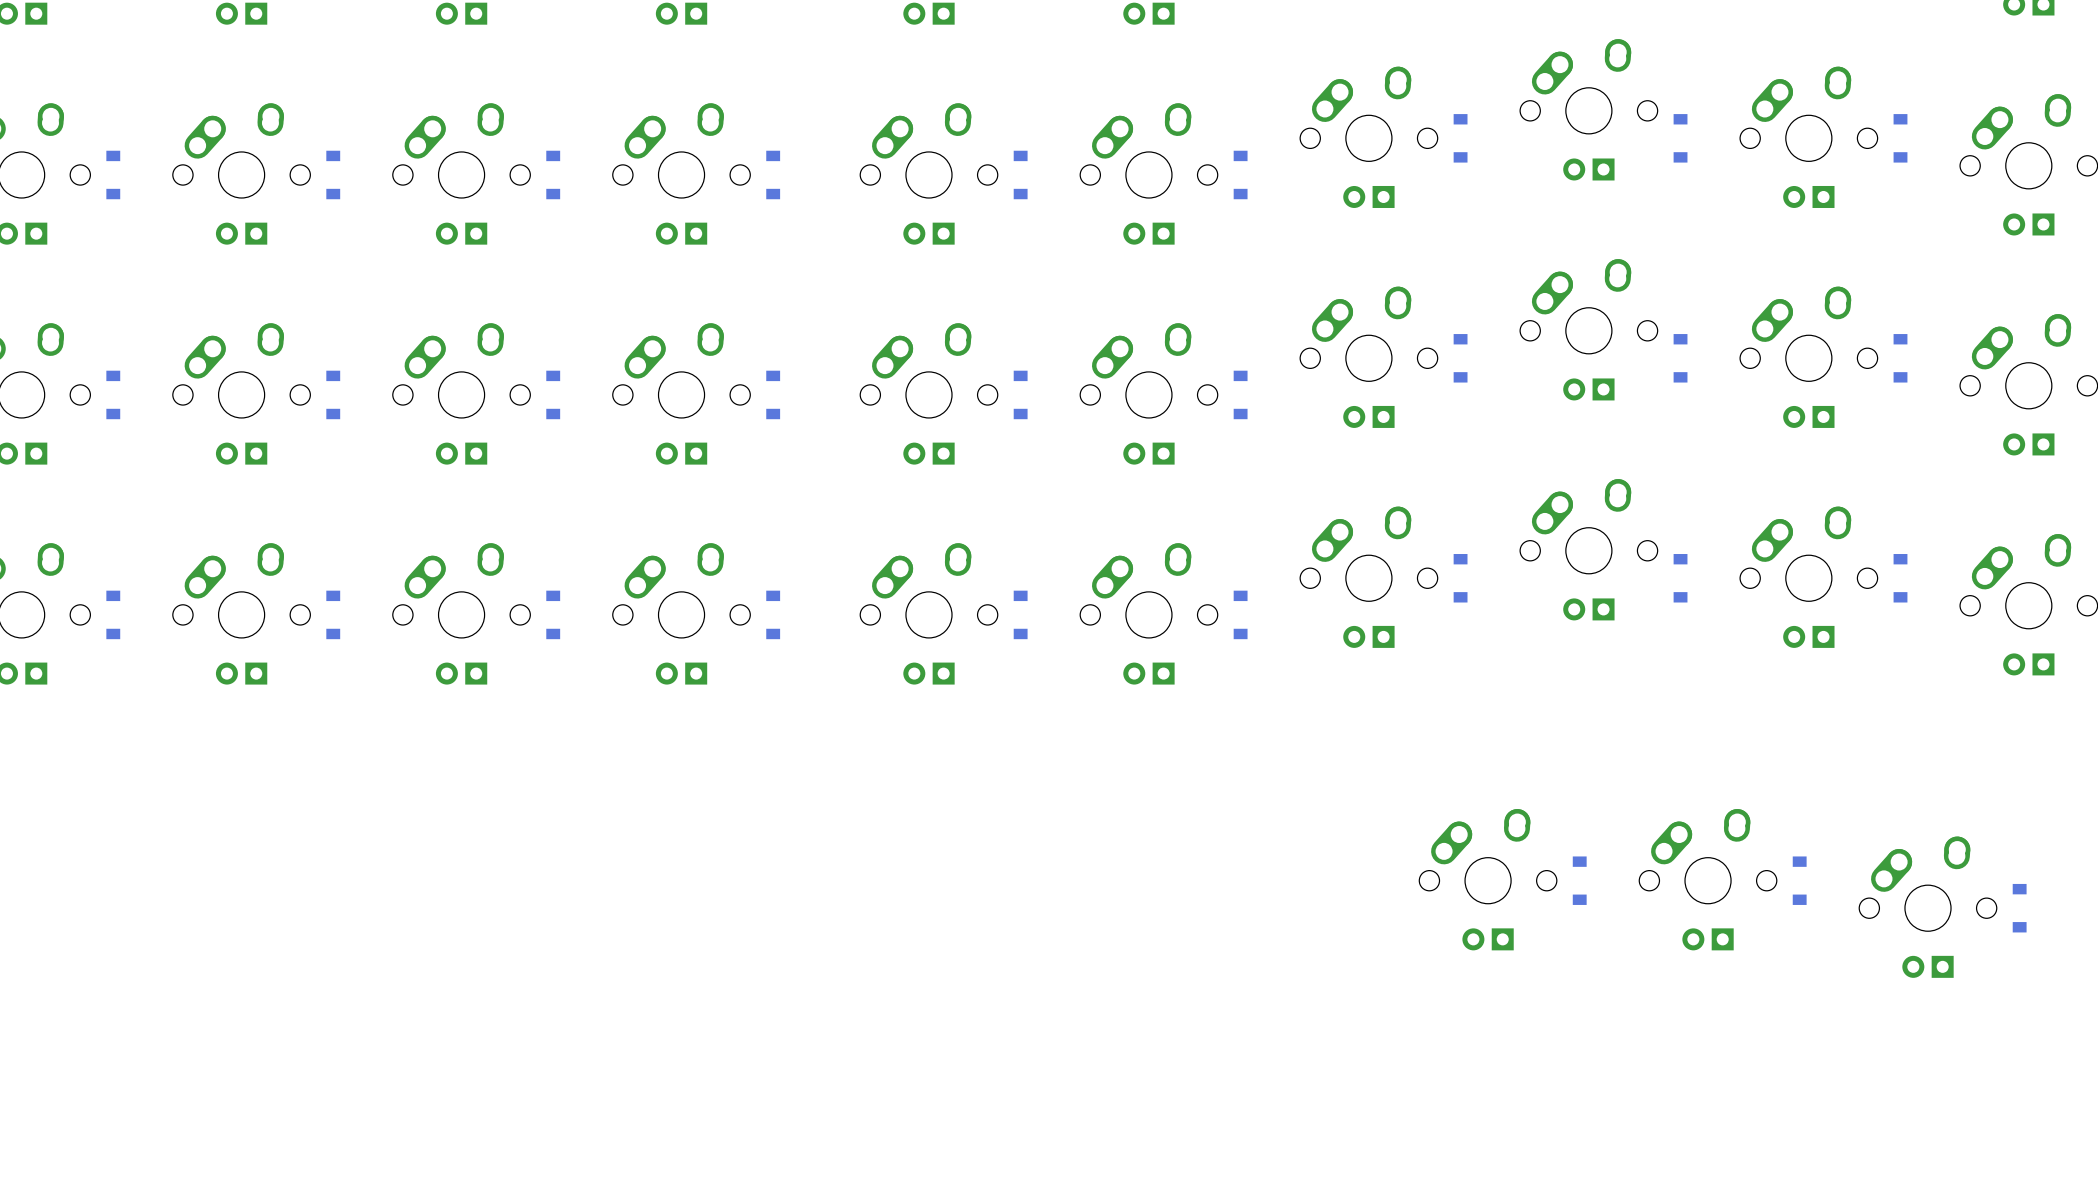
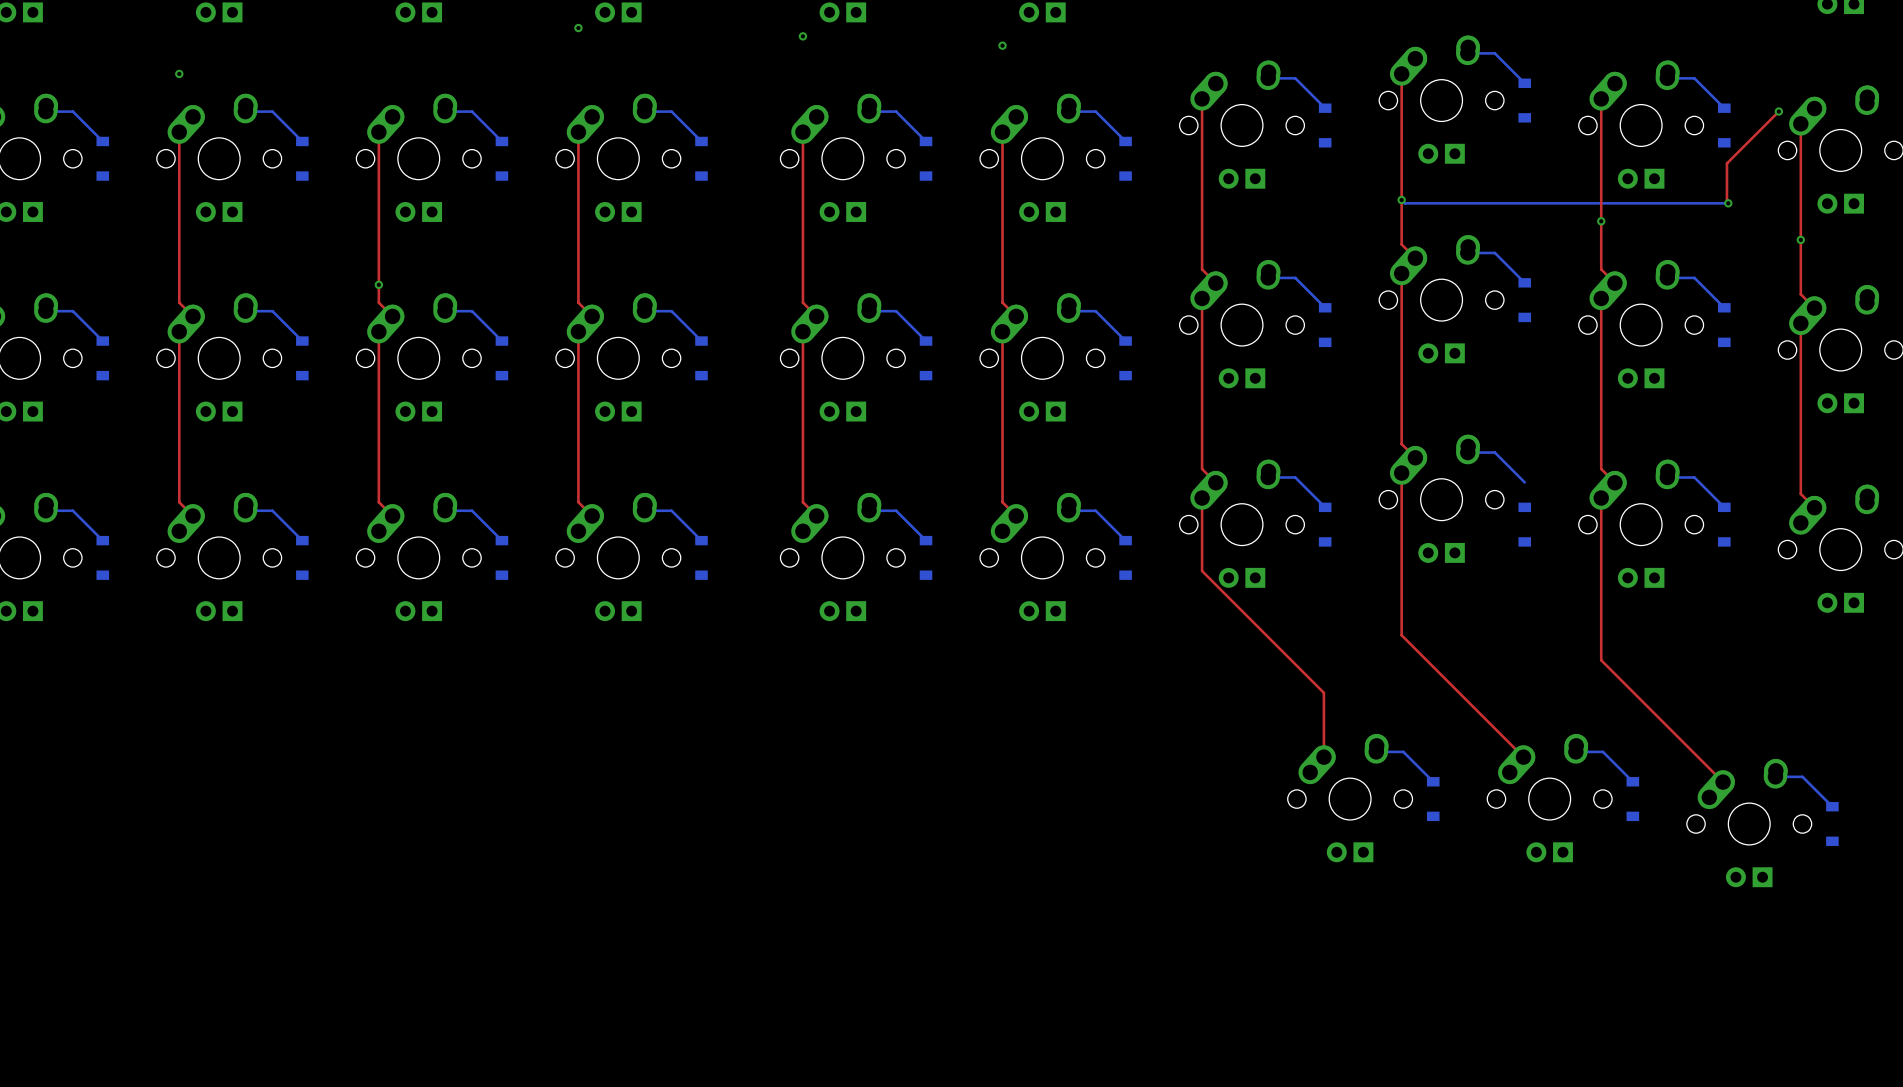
via: none -> (578, 28)
via: none -> (802, 36)
via: none -> (1002, 45)
bottom track: none -> (1467, 53) (1494, 53) (1524, 83)
via: none -> (179, 73)
top track: none -> (1401, 73) (1401, 244) (1415, 258)
bottom track: none -> (1268, 78) (1295, 78) (1325, 108)
bottom track: none -> (1667, 78) (1694, 78) (1724, 108)
top track: none -> (1202, 98) (1202, 269) (1215, 283)
top track: none -> (1601, 98) (1601, 269) (1614, 283)
top track: none -> (1778, 111) (1726, 163) (1728, 203)
via: none -> (1778, 111)
bottom track: none -> (45, 111) (72, 111) (102, 141)
bottom track: none -> (245, 111) (272, 111) (302, 141)
bottom track: none -> (444, 111) (472, 111) (501, 141)
bottom track: none -> (644, 111) (671, 111) (701, 141)
bottom track: none -> (869, 111) (896, 111) (926, 141)
bottom track: none -> (1068, 111) (1095, 111) (1125, 141)
top track: none -> (1800, 123) (1800, 294) (1814, 308)
part position: (1680, 138) -> (1524, 100)
top track: none -> (179, 132) (179, 302) (193, 316)
top track: none -> (378, 132) (378, 302) (392, 316)
top track: none -> (578, 132) (578, 302) (592, 316)
top track: none -> (802, 132) (802, 302) (816, 316)
top track: none -> (1002, 132) (1002, 302) (1016, 316)
bottom track: none -> (1401, 200) (1404, 203) (1728, 203)
via: none -> (1401, 200)
via: none -> (1728, 203)
via: none -> (1601, 221)
via: none -> (1800, 239)
bottom track: none -> (1467, 252) (1494, 252) (1524, 282)
top track: none -> (1401, 273) (1401, 444) (1415, 457)
bottom track: none -> (1268, 277) (1295, 277) (1325, 307)
bottom track: none -> (1667, 277) (1694, 277) (1724, 307)
via: none -> (378, 284)
top track: none -> (1202, 298) (1202, 469) (1215, 482)
top track: none -> (1601, 298) (1601, 469) (1614, 482)
bottom track: none -> (45, 311) (72, 311) (102, 341)
bottom track: none -> (245, 311) (272, 311) (302, 341)
bottom track: none -> (444, 311) (472, 311) (501, 341)
bottom track: none -> (644, 311) (671, 311) (701, 341)
bottom track: none -> (869, 311) (896, 311) (926, 341)
bottom track: none -> (1068, 311) (1095, 311) (1125, 341)
top track: none -> (1800, 323) (1800, 493) (1814, 507)
part position: (1680, 358) -> (1524, 300)
top track: none -> (179, 331) (179, 502) (193, 516)
top track: none -> (378, 331) (378, 502) (392, 516)
top track: none -> (578, 331) (578, 502) (592, 516)
top track: none -> (802, 331) (802, 502) (816, 516)
top track: none -> (1002, 331) (1002, 502) (1016, 516)
bottom track: none -> (1467, 452) (1494, 452) (1524, 482)
top track: none -> (1401, 473) (1401, 635) (1523, 757)
bottom track: none -> (1268, 477) (1295, 477) (1325, 507)
bottom track: none -> (1667, 477) (1694, 477) (1724, 507)
top track: none -> (1202, 498) (1202, 571) (1323, 692) (1323, 757)
top track: none -> (1601, 498) (1601, 660) (1723, 782)
bottom track: none -> (45, 510) (72, 510) (102, 540)
bottom track: none -> (245, 510) (272, 510) (302, 540)
bottom track: none -> (444, 510) (472, 510) (501, 540)
bottom track: none -> (644, 510) (671, 510) (701, 540)
bottom track: none -> (869, 510) (896, 510) (926, 540)
bottom track: none -> (1068, 510) (1095, 510) (1125, 540)
bottom track: none -> (1376, 751) (1403, 751) (1433, 781)
bottom track: none -> (1575, 751) (1602, 751) (1632, 781)
bottom track: none -> (1775, 776) (1802, 776) (1832, 806)

